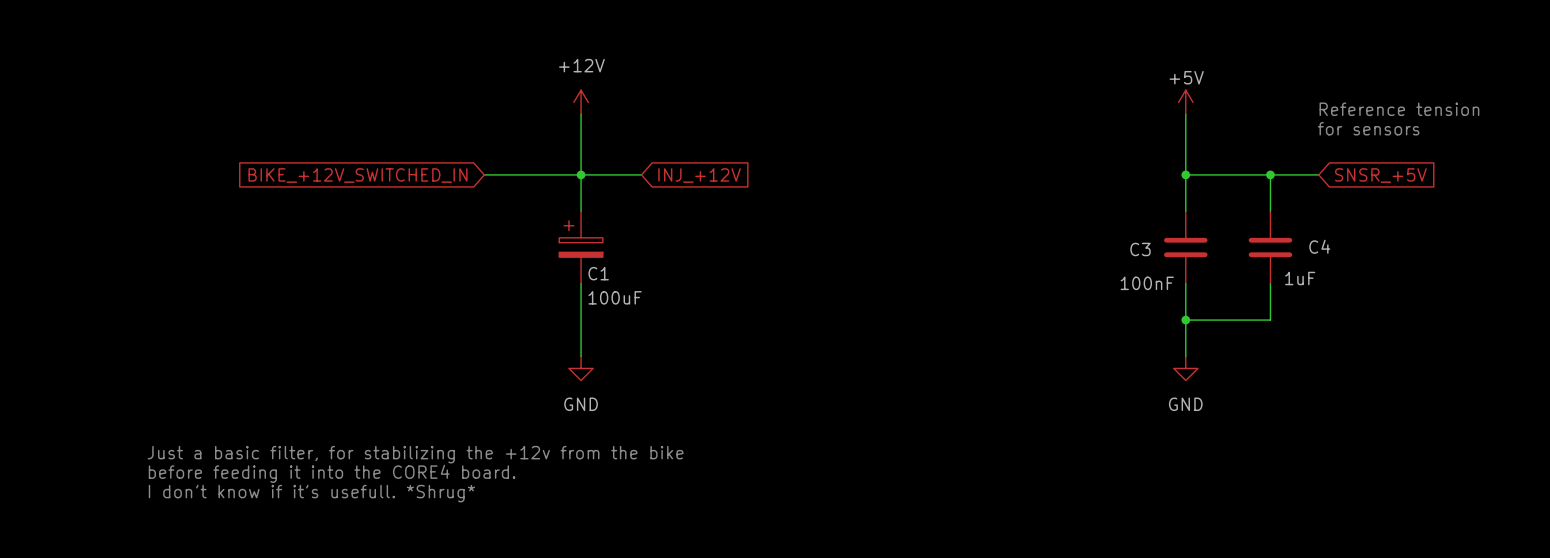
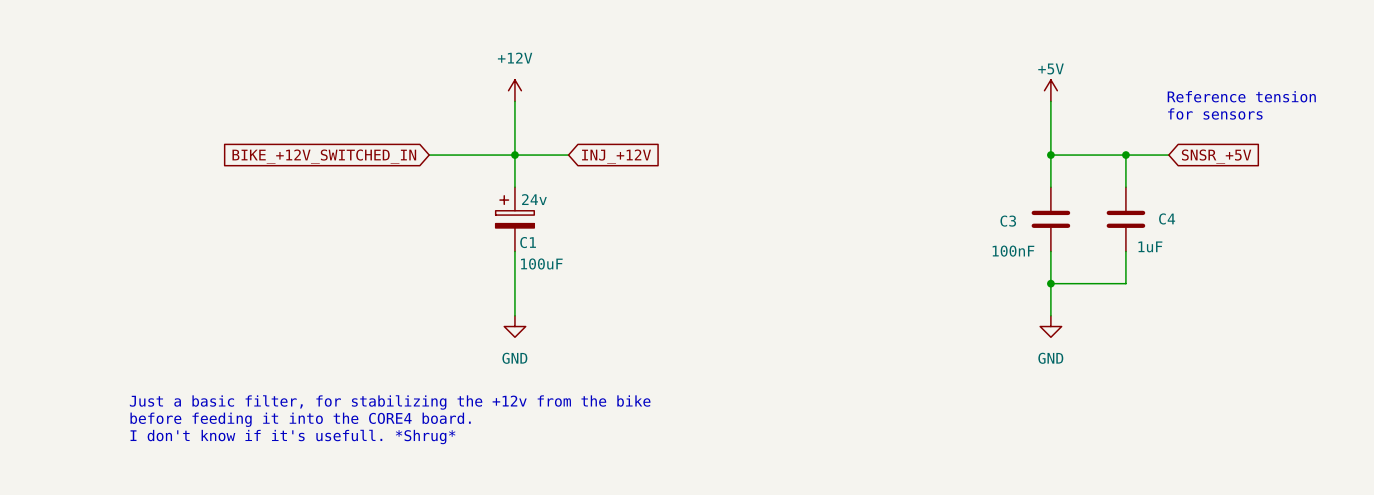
C1 text: none -> 24v (534, 199)

